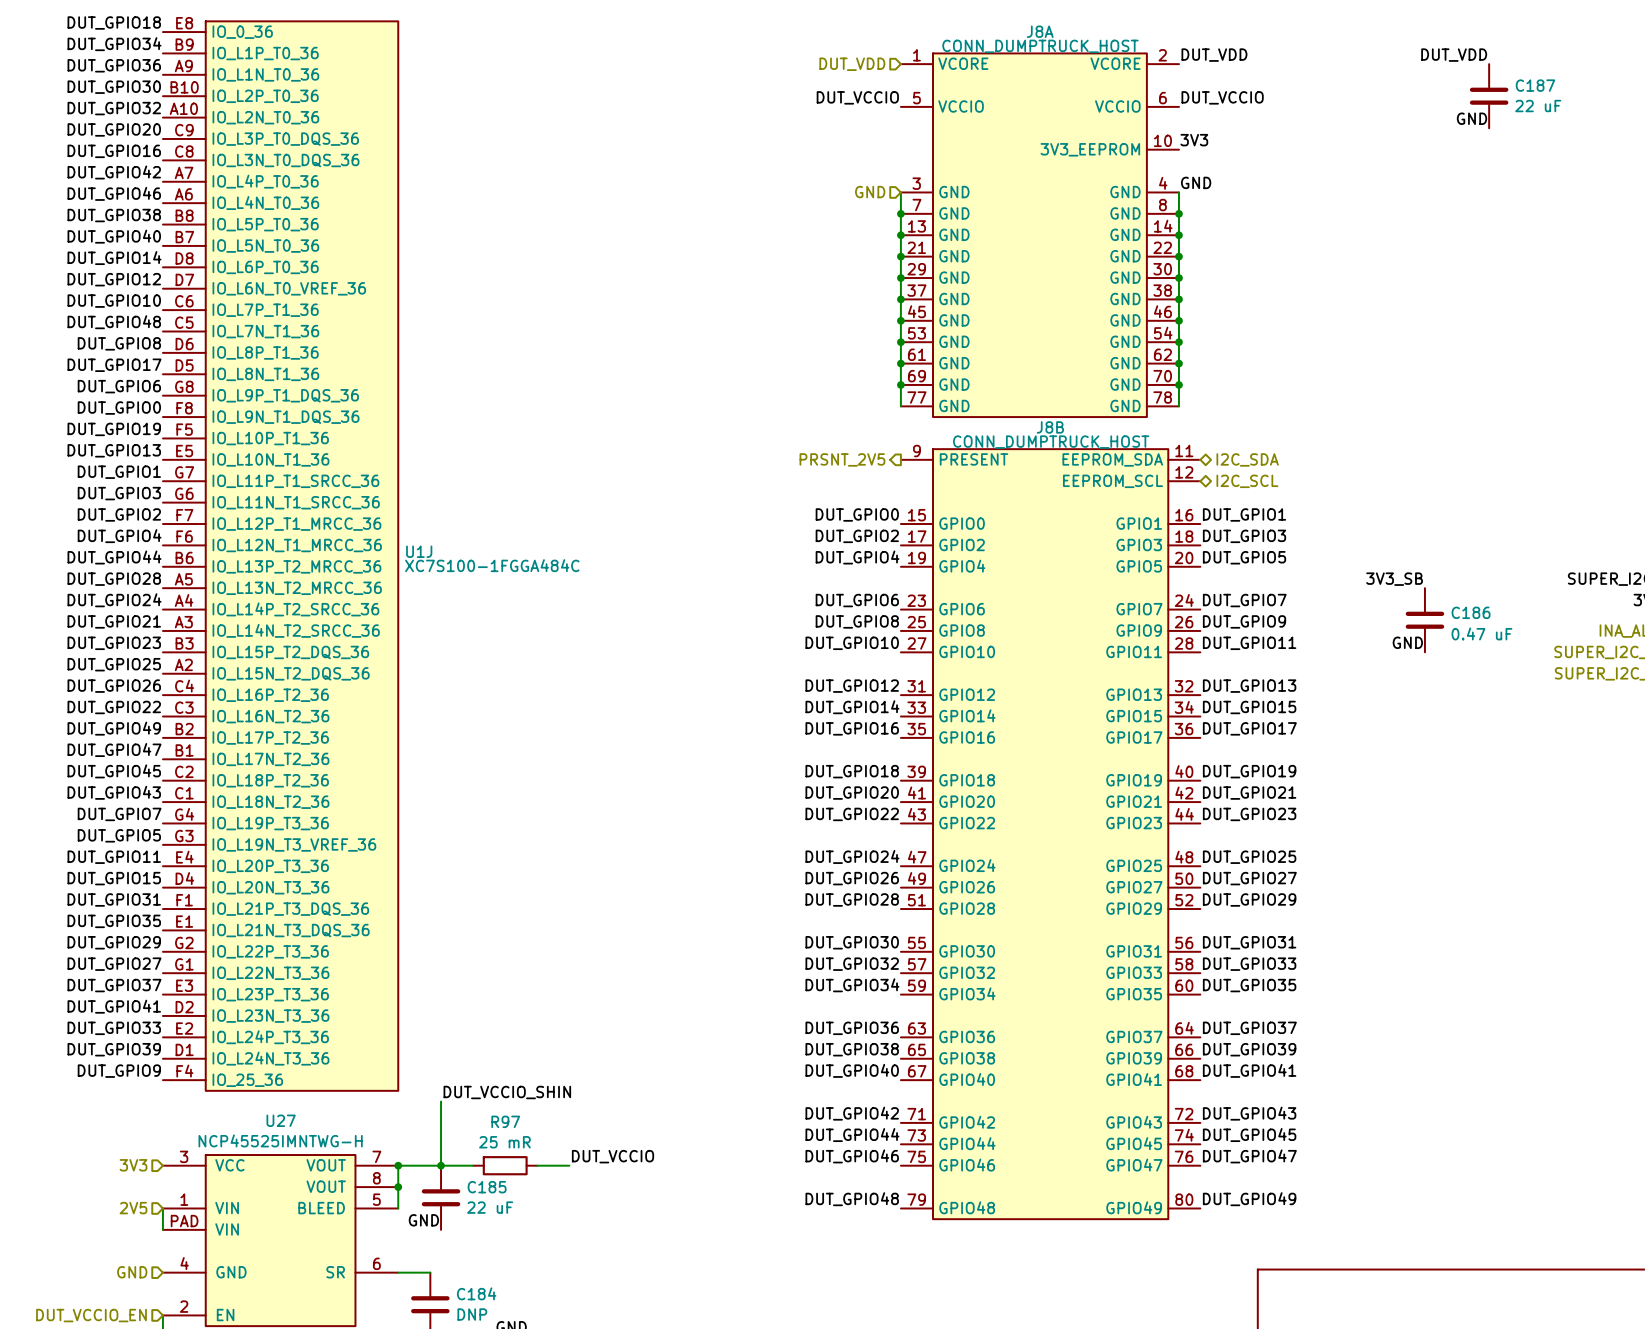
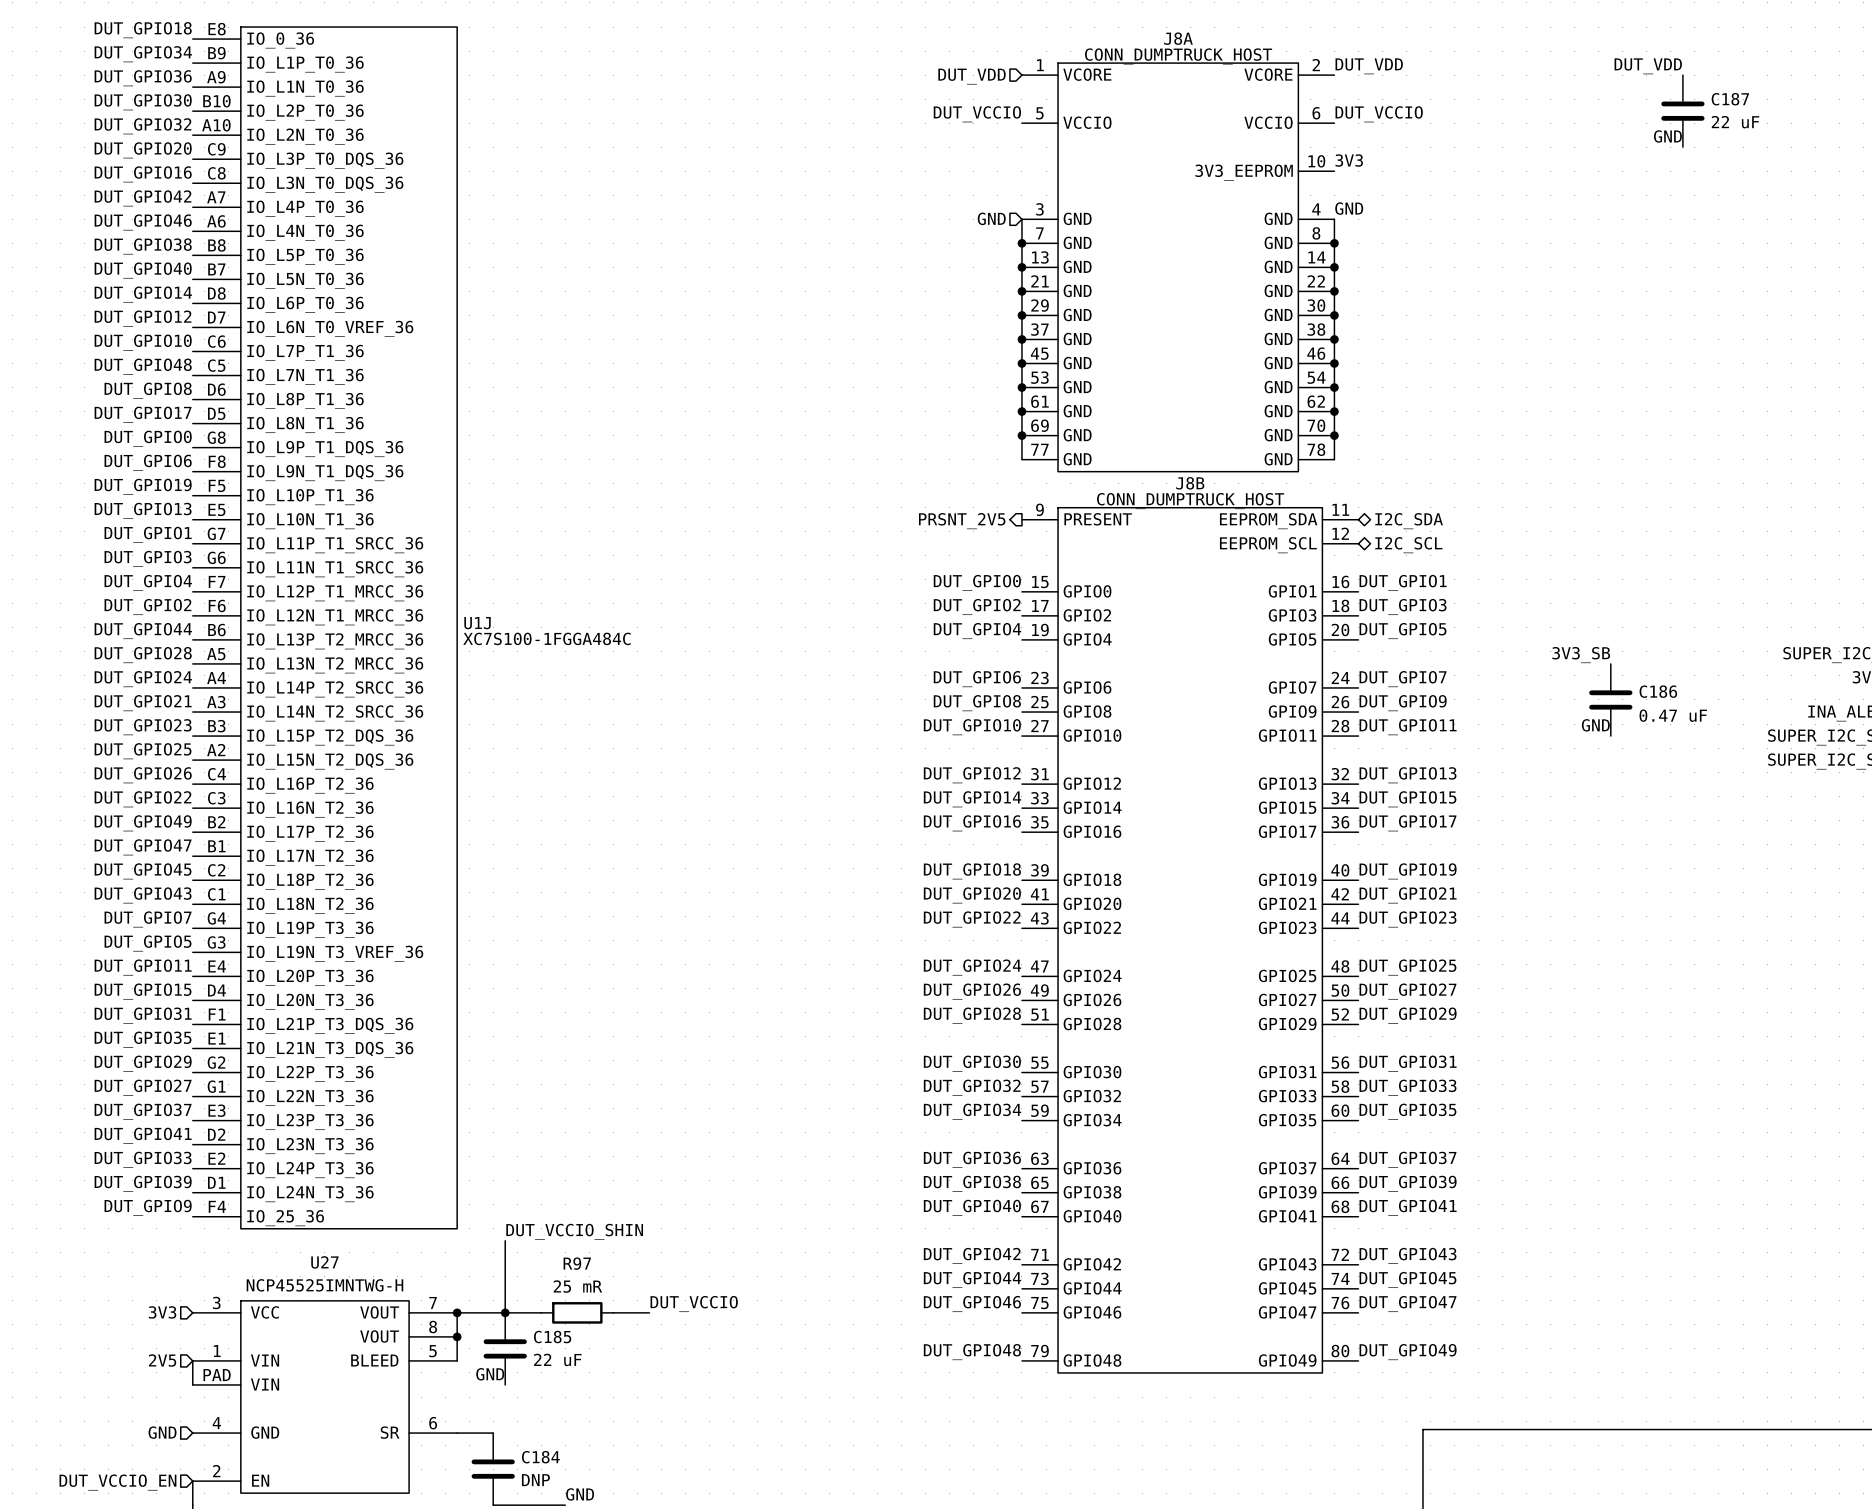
label: DUT_GPIO6 (119, 386) -> DUT_GPIO0 (148, 438)
label: DUT_GPIO0 (119, 408) -> DUT_GPIO6 (148, 462)
label: DUT_GPIO2 (119, 514) -> DUT_GPIO4 (148, 582)
label: DUT_GPIO4 (119, 536) -> DUT_GPIO2 (147, 606)

